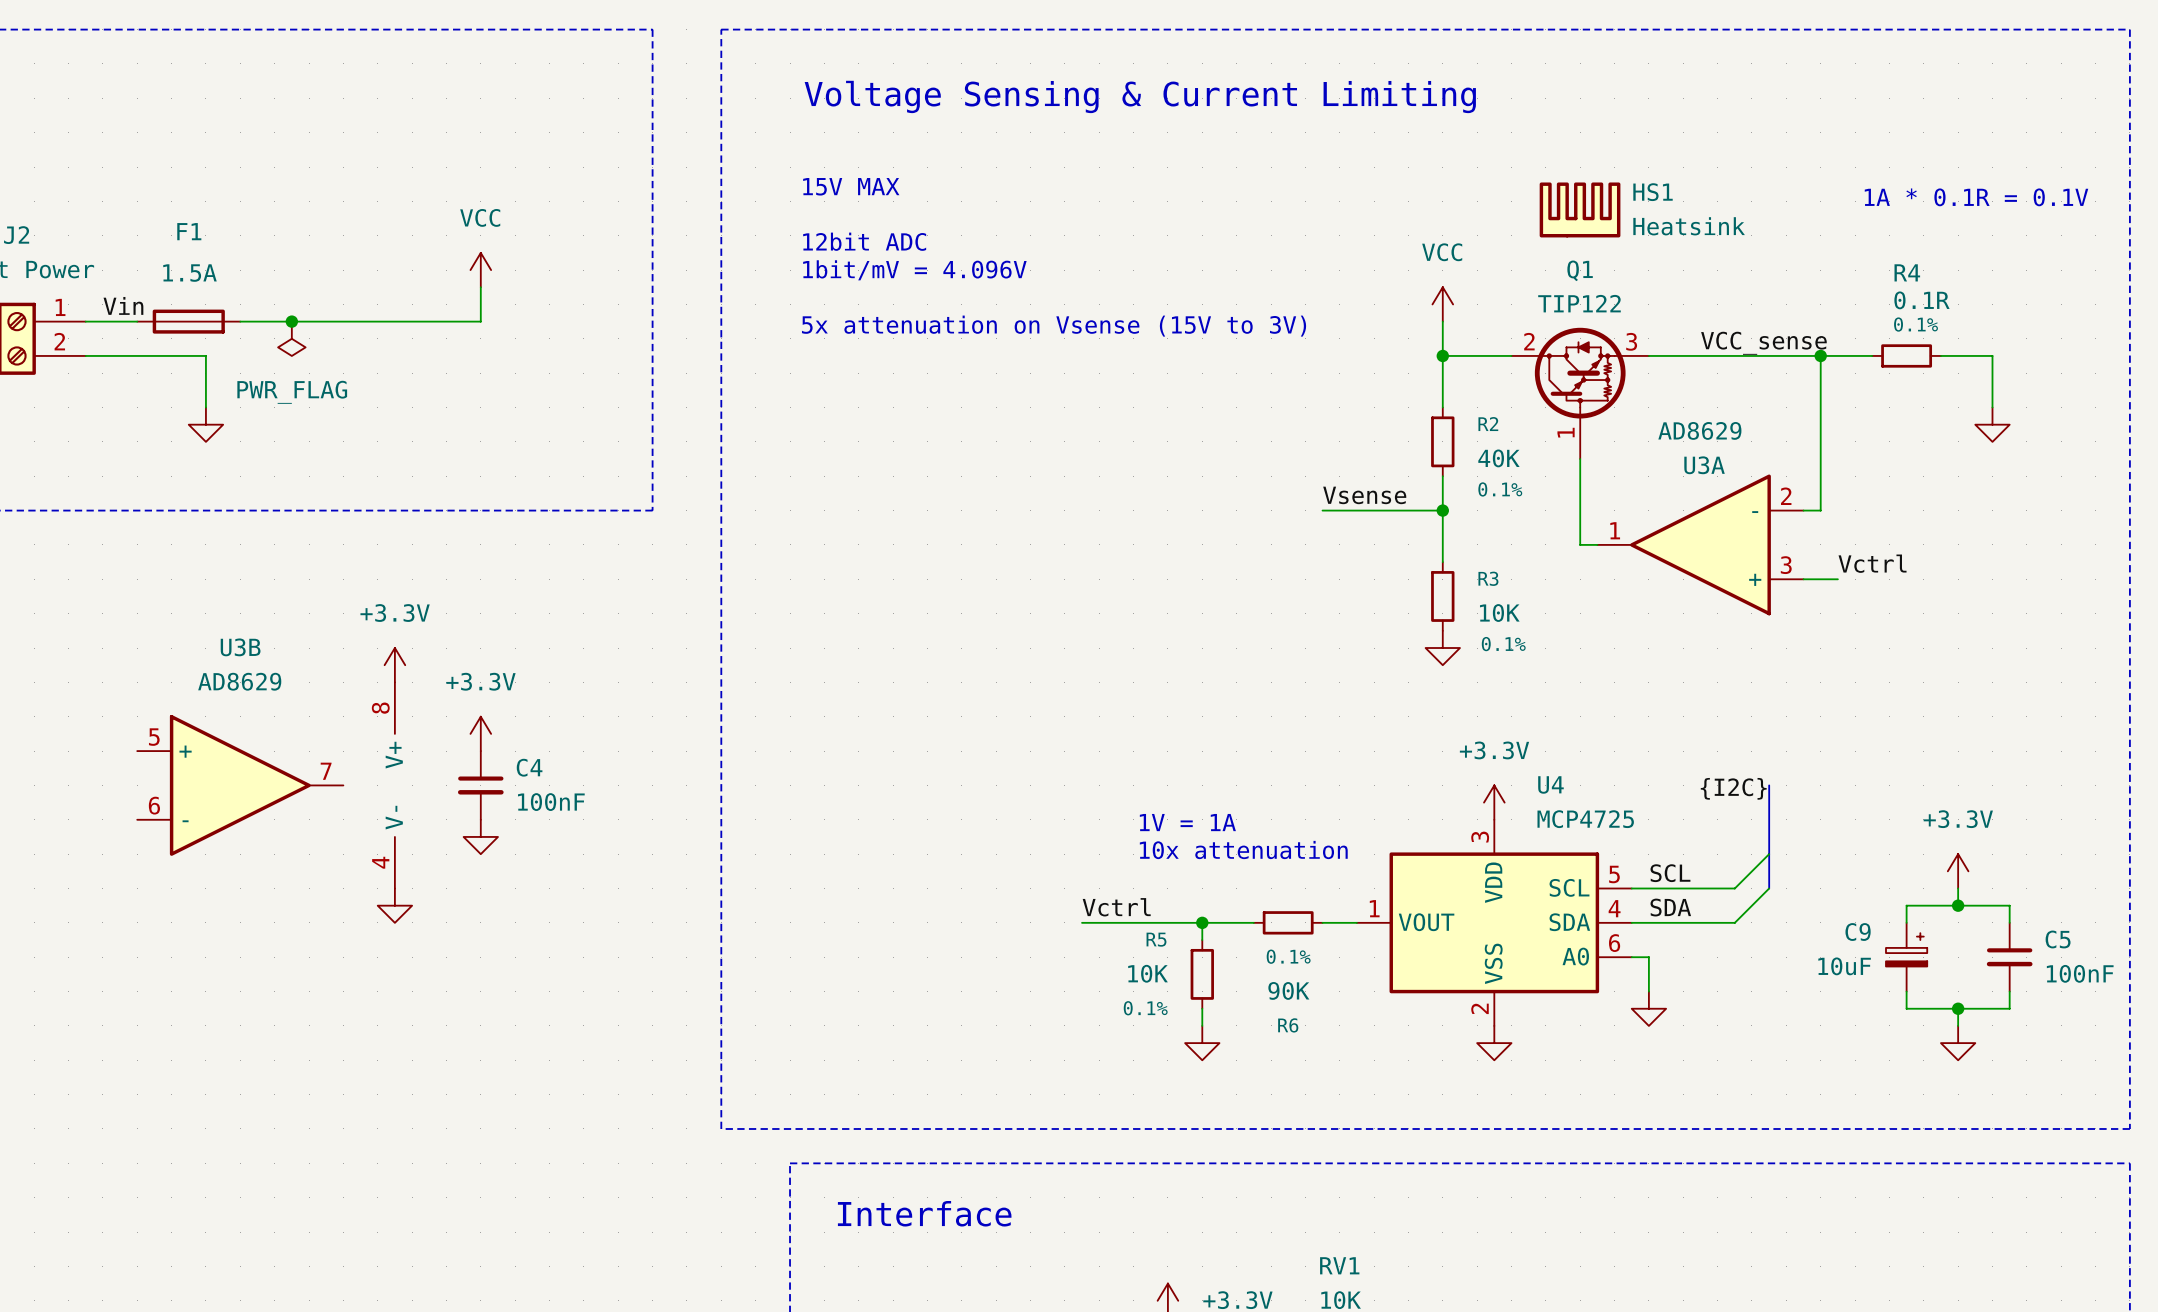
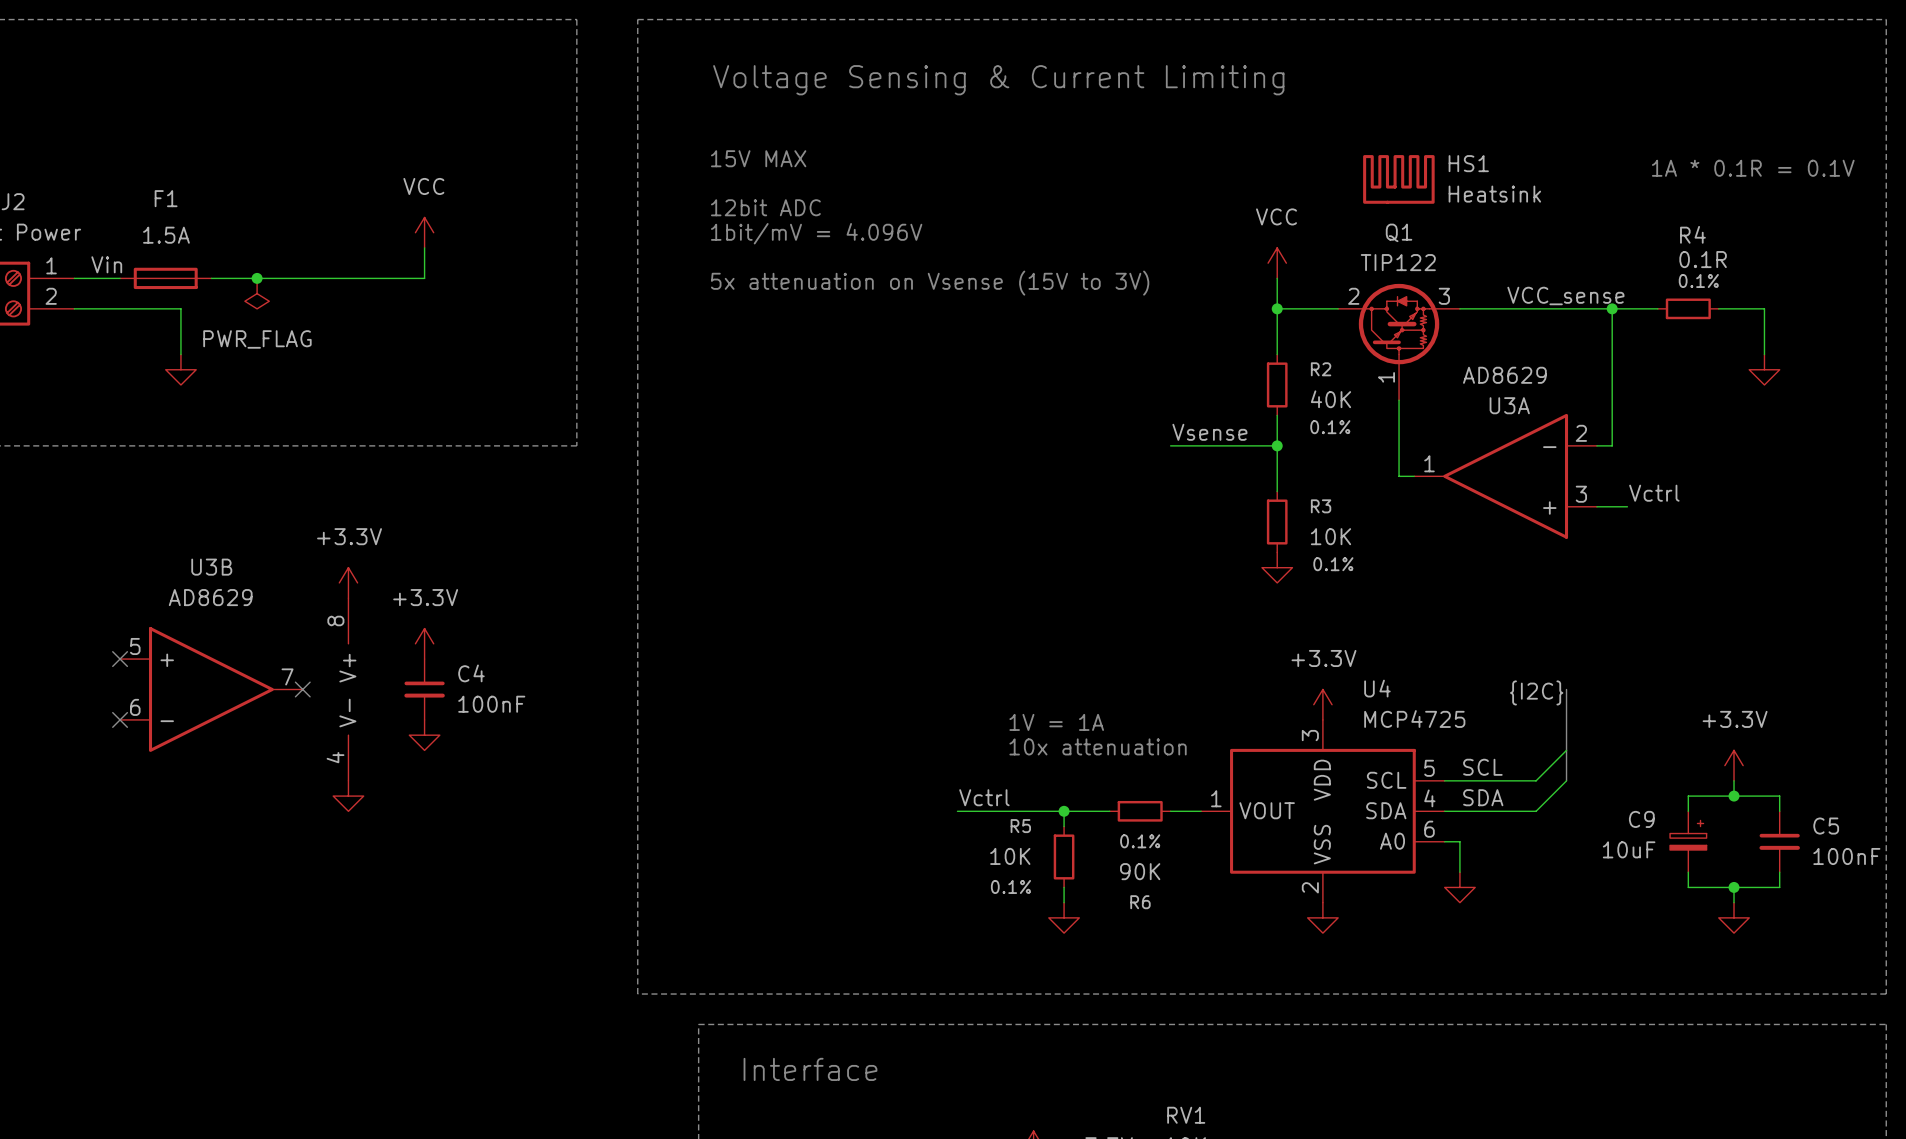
no-connect mark: none -> (120, 659)
no-connect mark: none -> (302, 689)
no-connect mark: none -> (120, 719)

